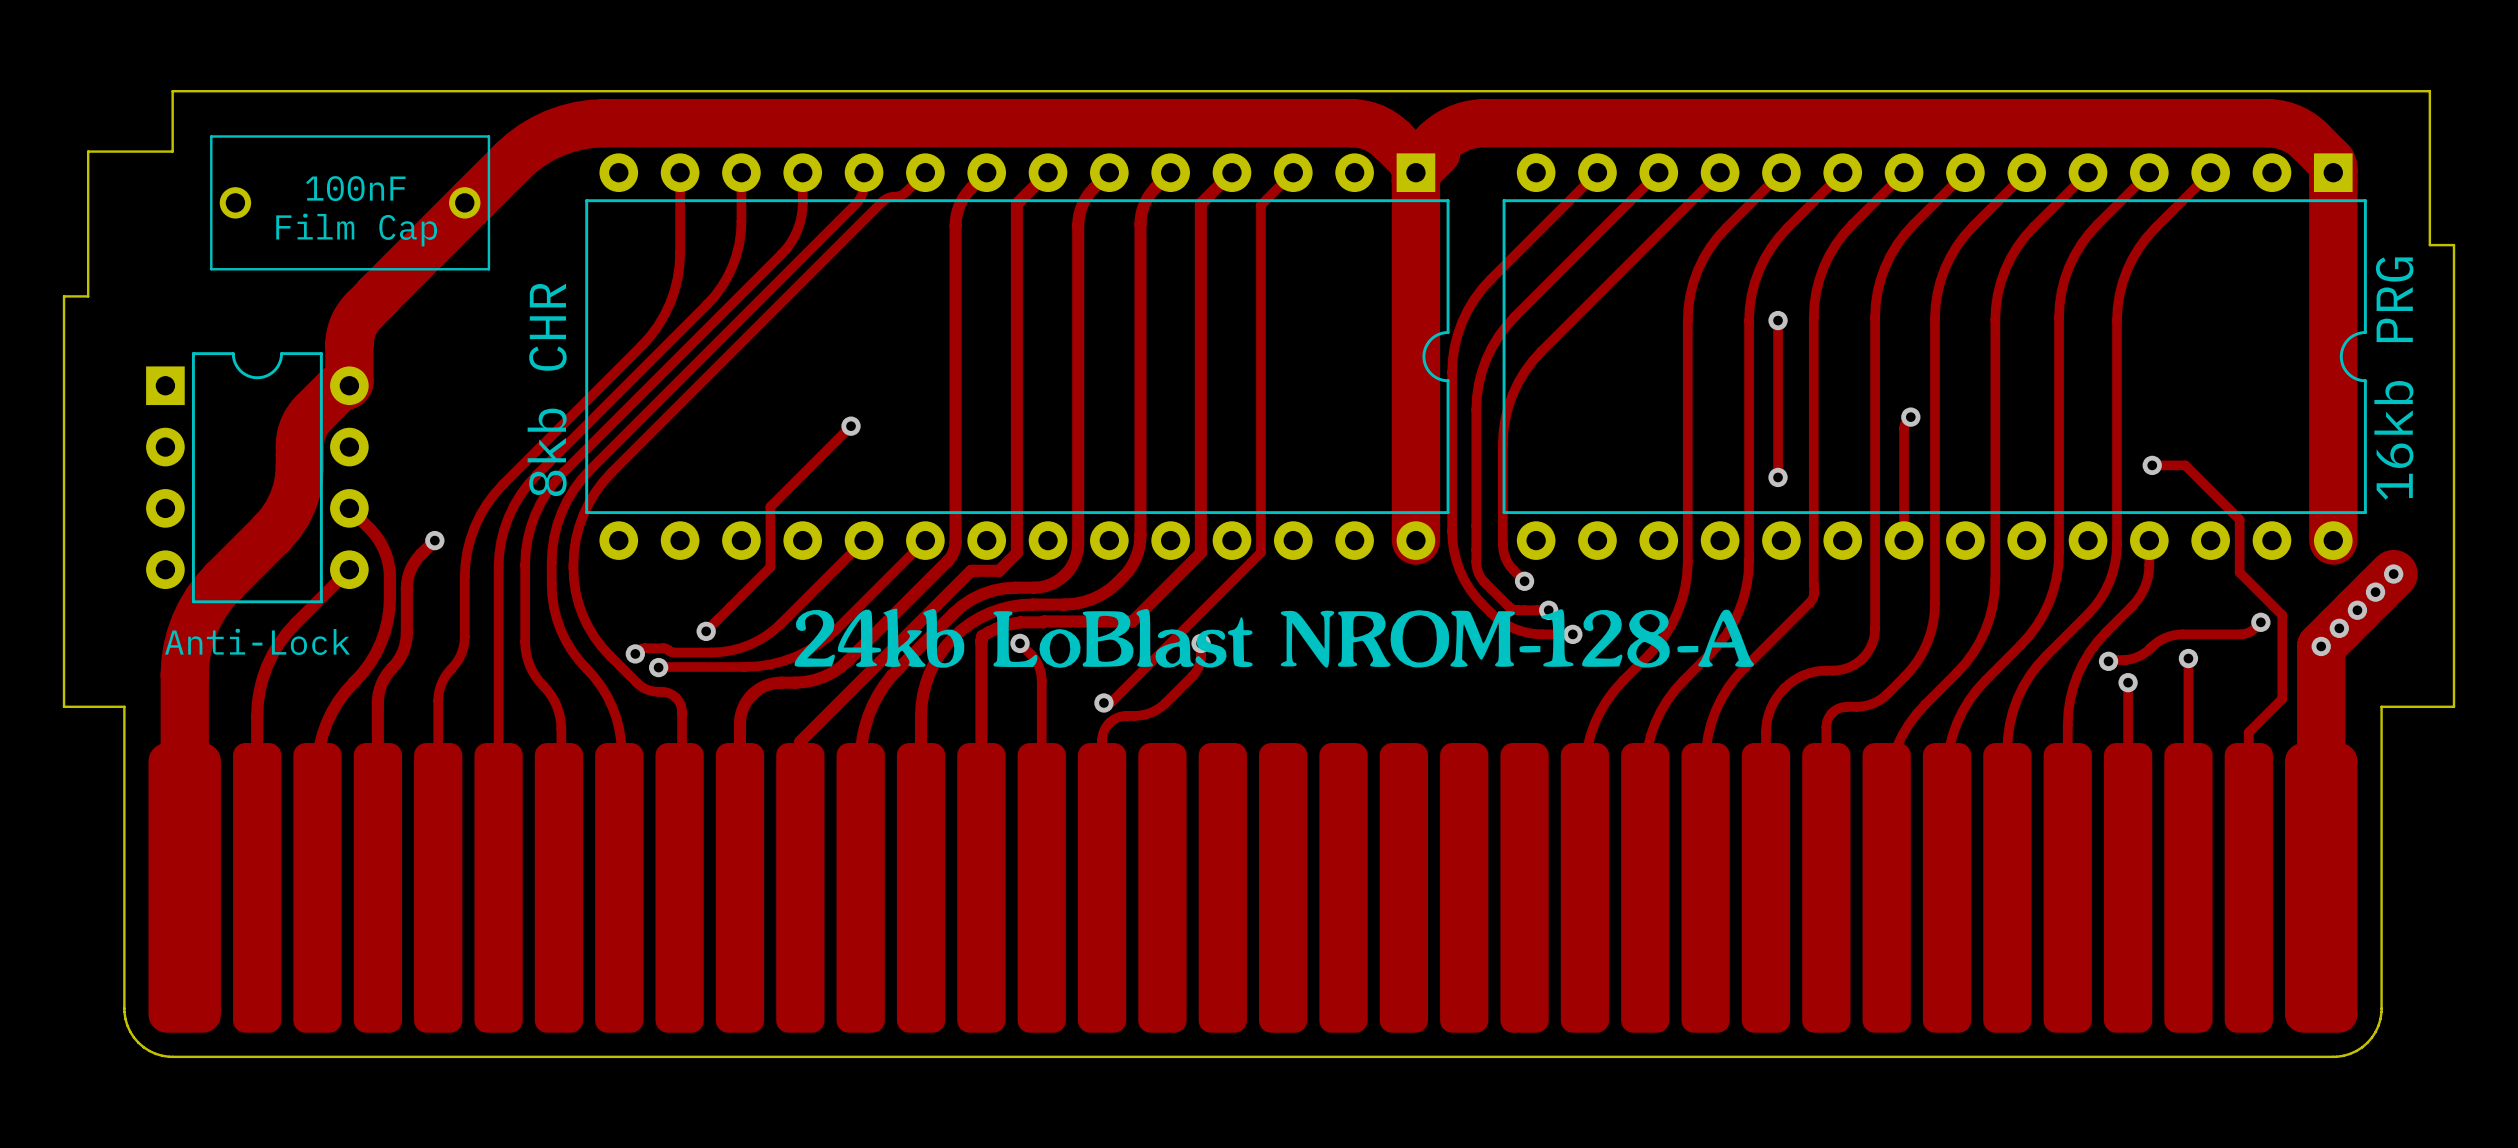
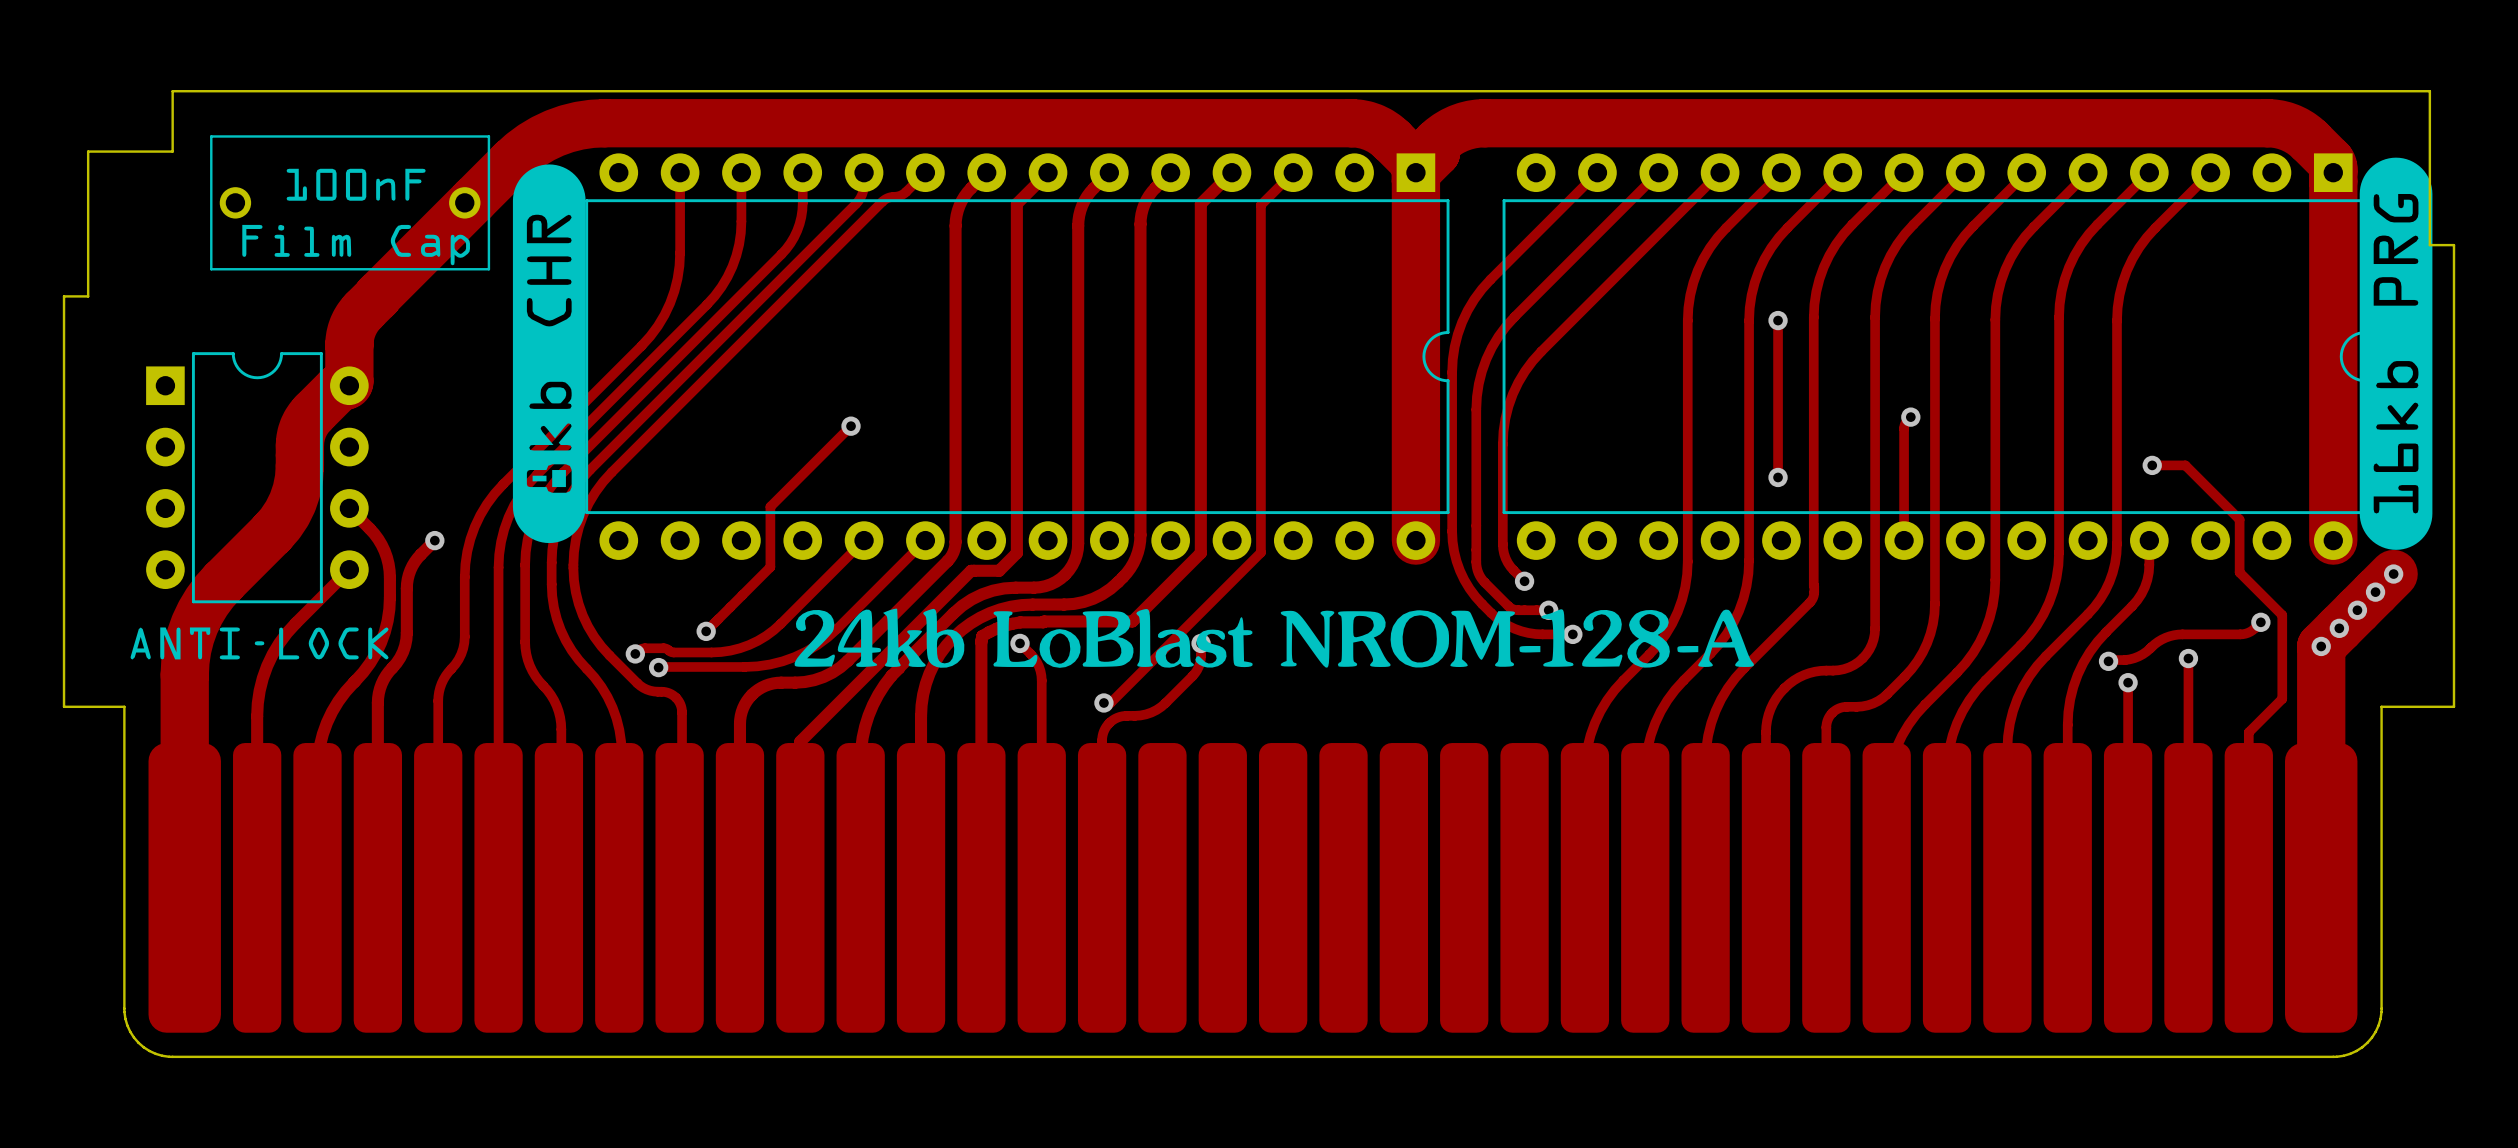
drawing: none -> [2359, 157, 2433, 550]
drawing: none -> [512, 164, 586, 544]
drawing: none -> [242, 168, 470, 266]
text: 100nF (355, 188) -> none
text: Film Cap (356, 230) -> none
part value: 16kb PRG (2393, 378) -> none
part value: 8kb CHR (547, 389) -> none
drawing: none -> [130, 627, 389, 660]
part value: Anti-Lock (257, 641) -> none

